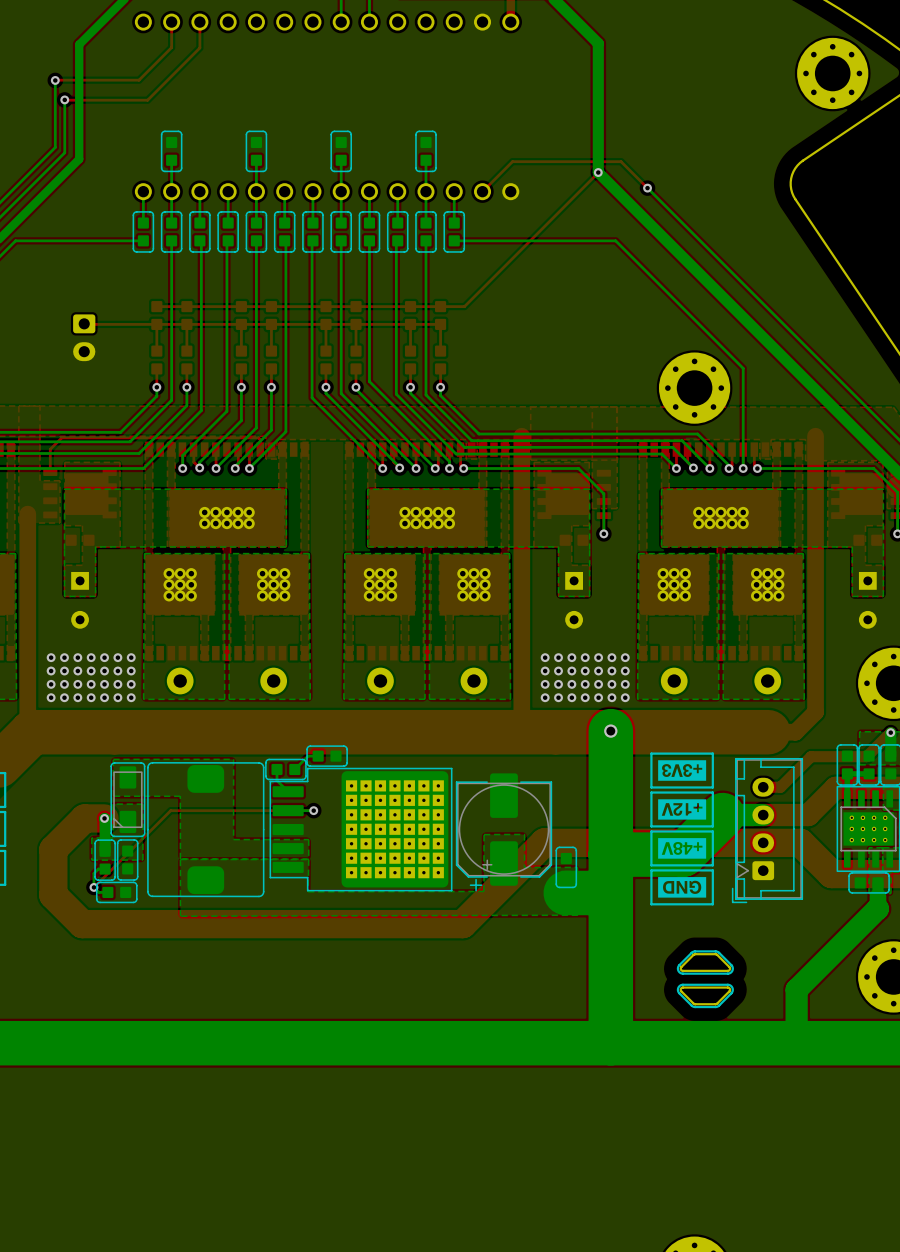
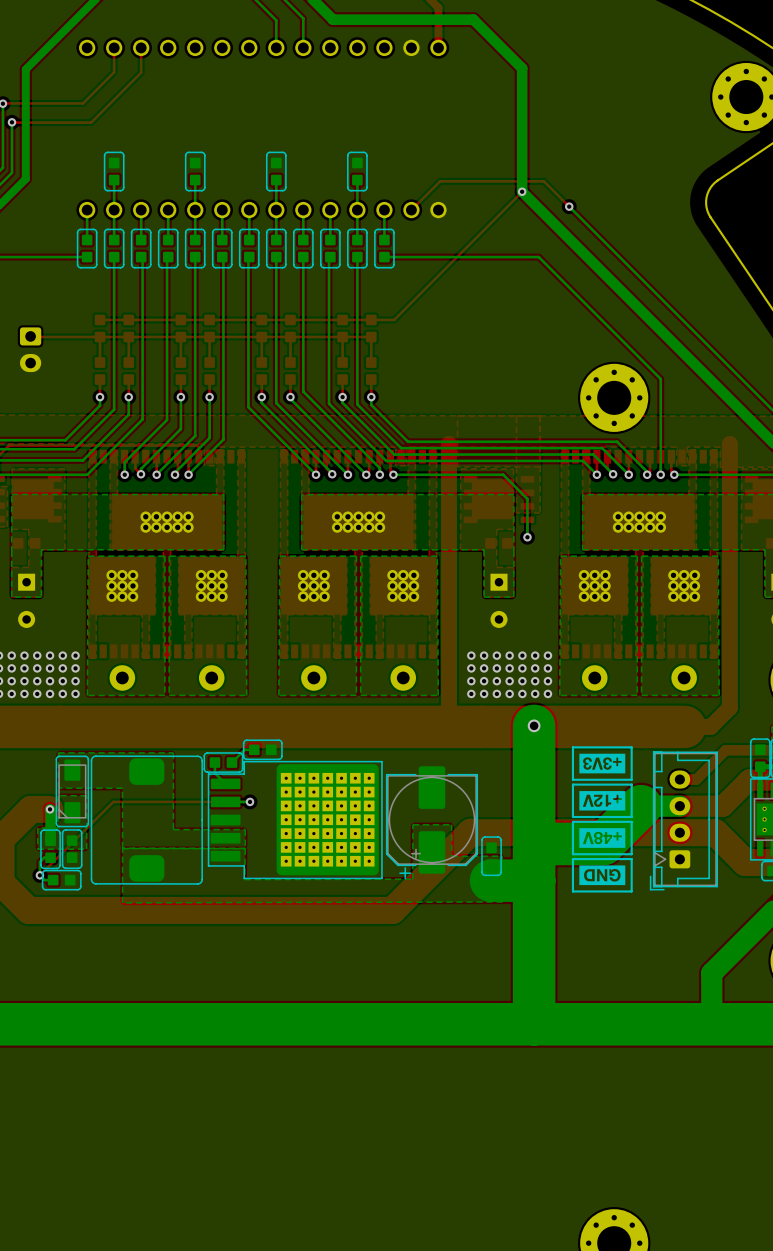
drawing: [676, 950, 734, 1009] -> none

